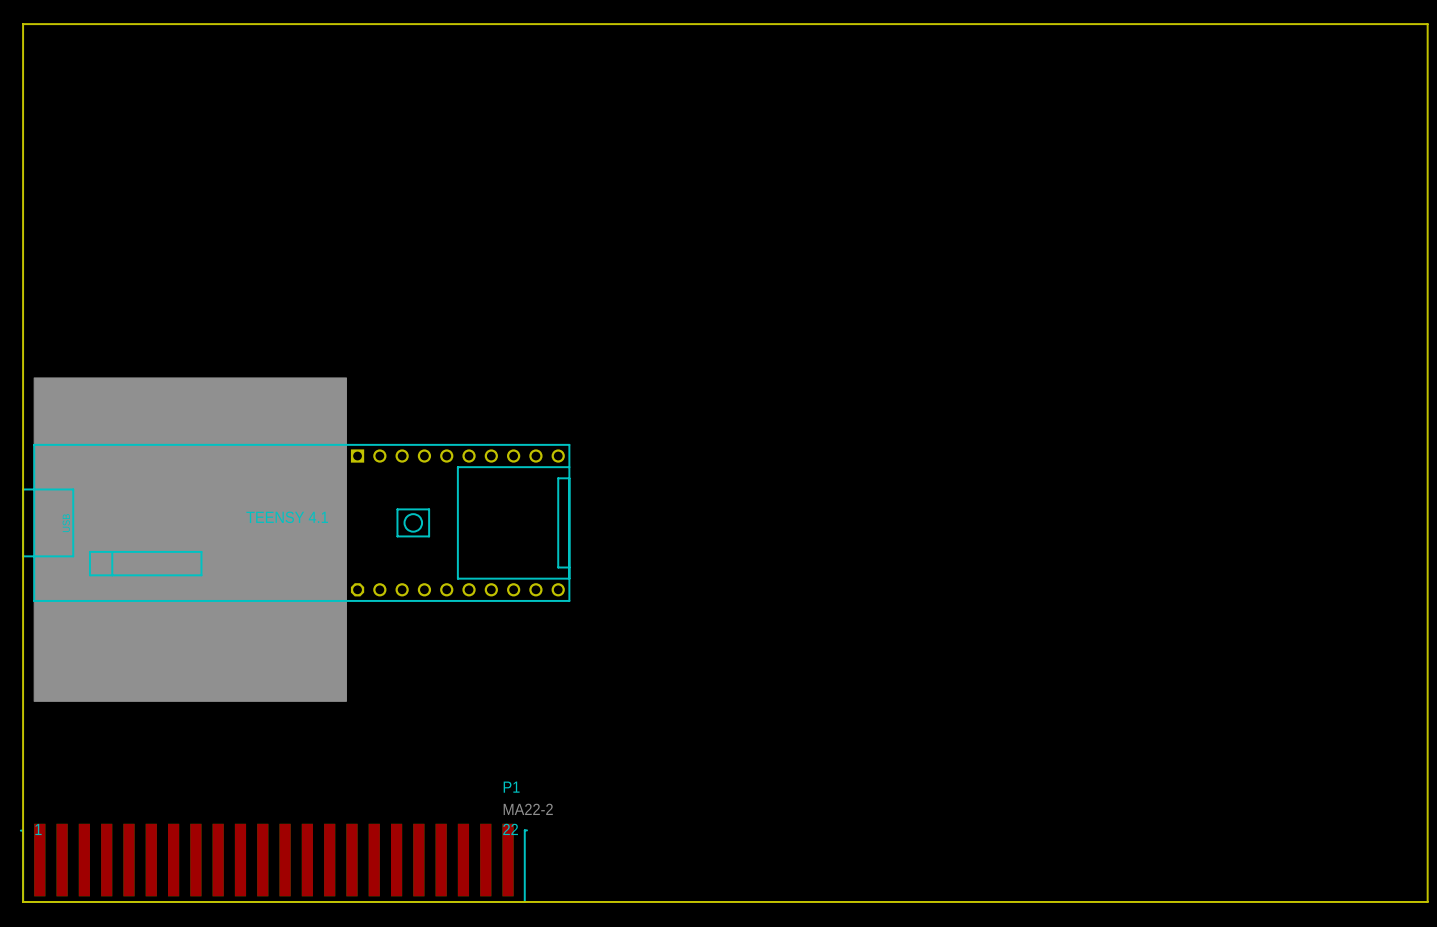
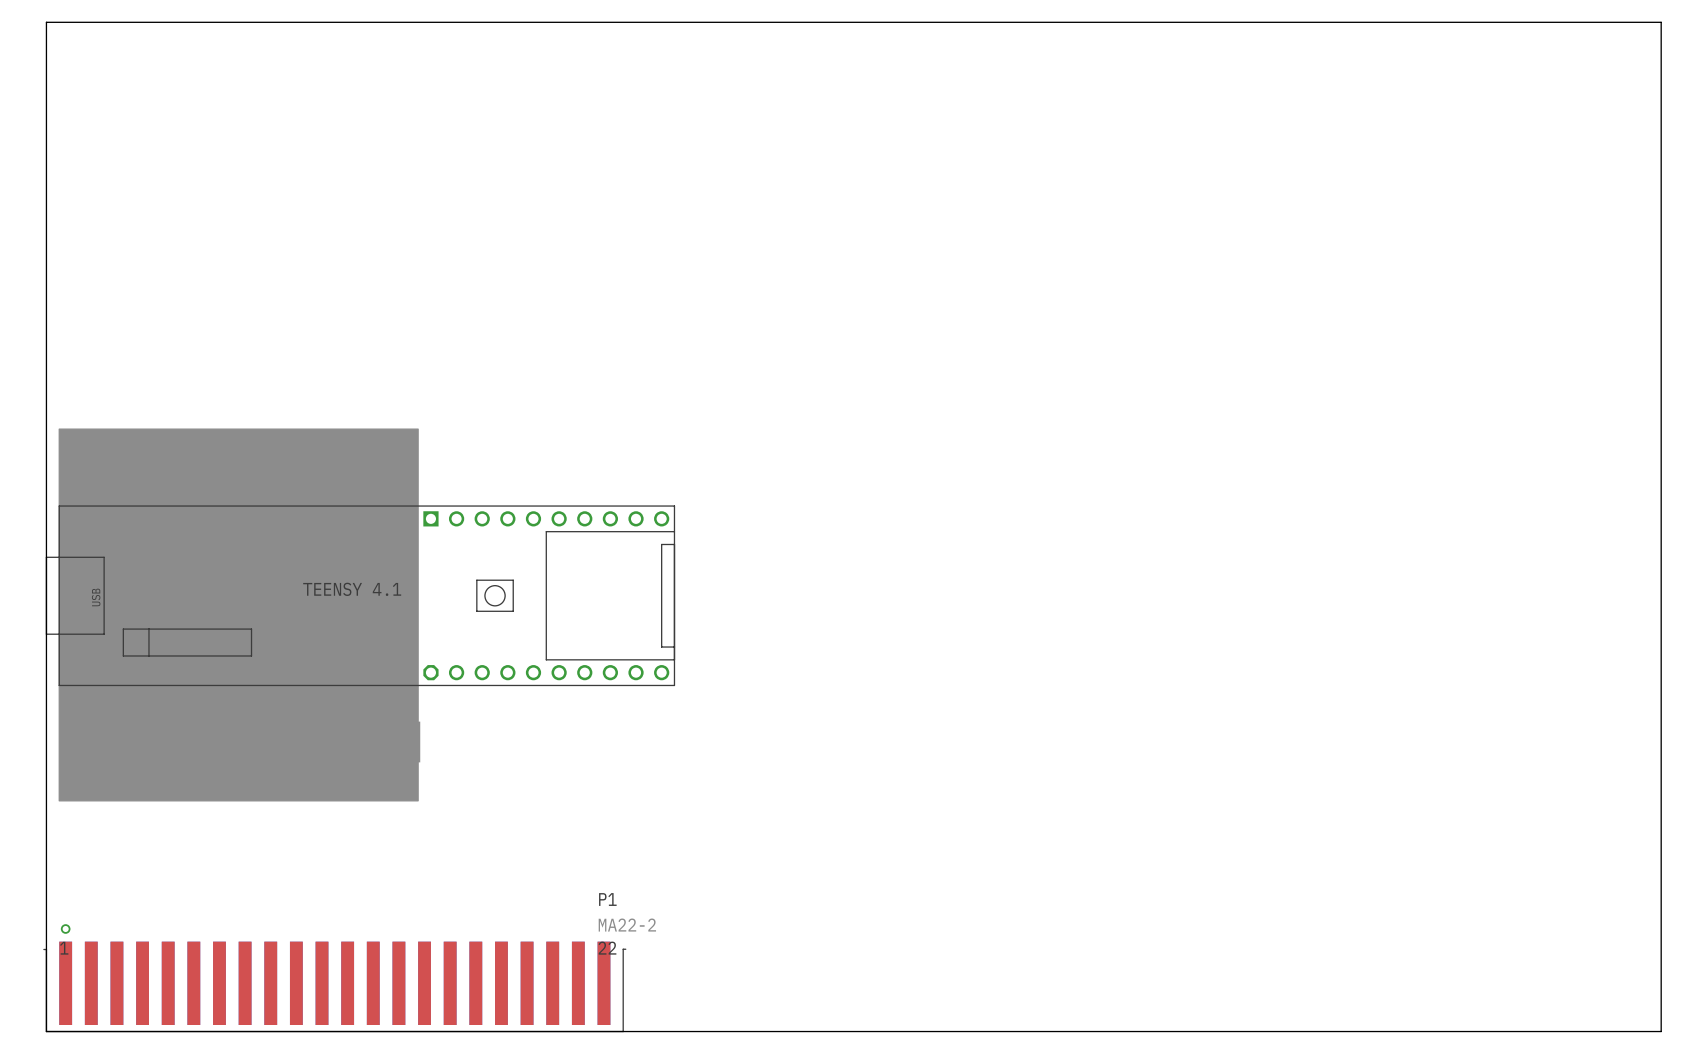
via: none -> (65, 928)

